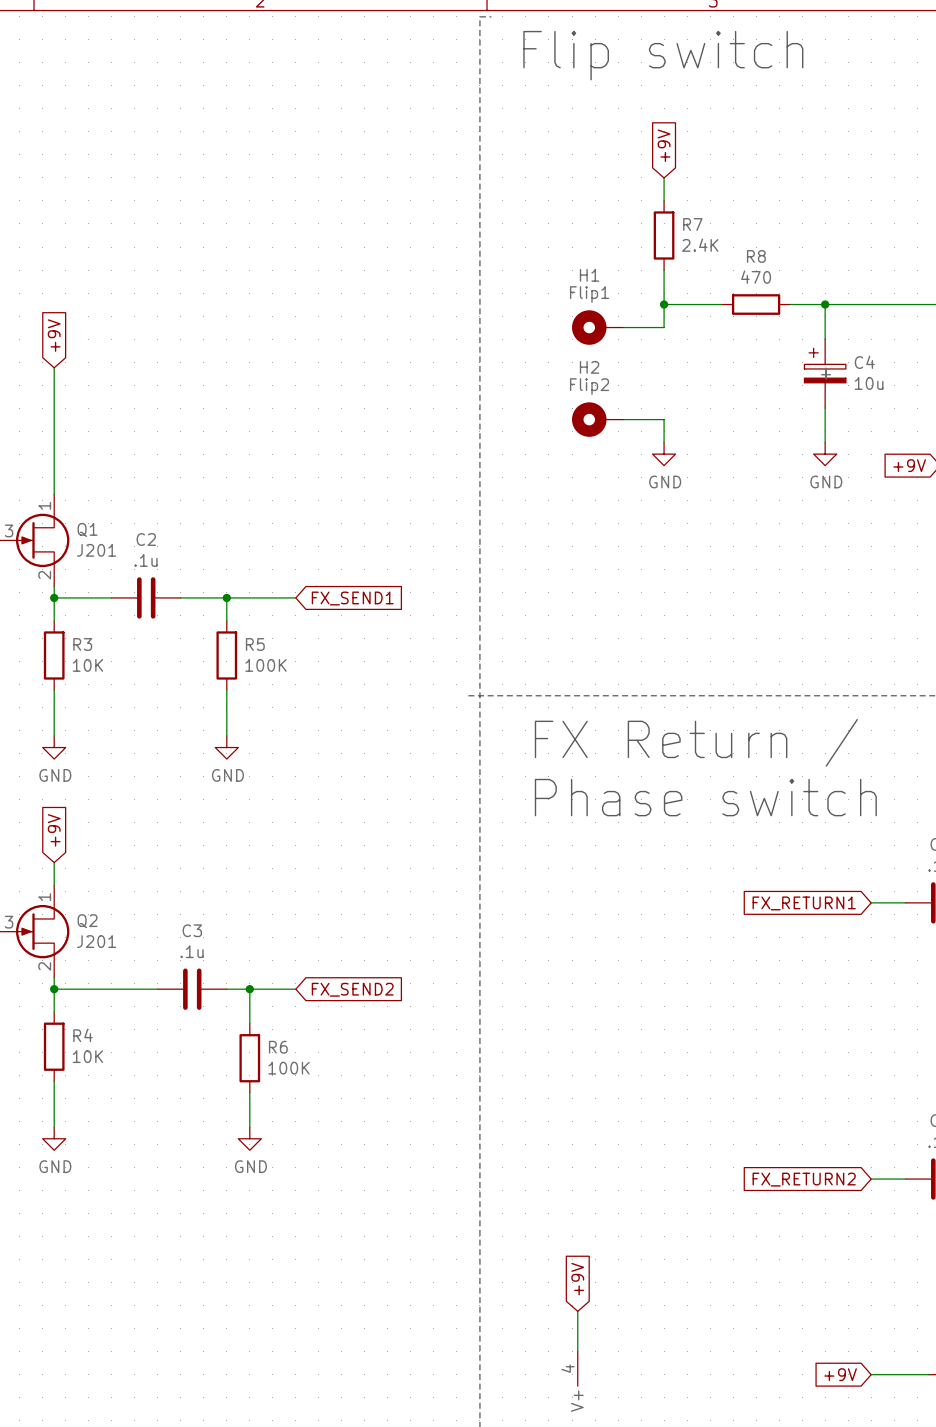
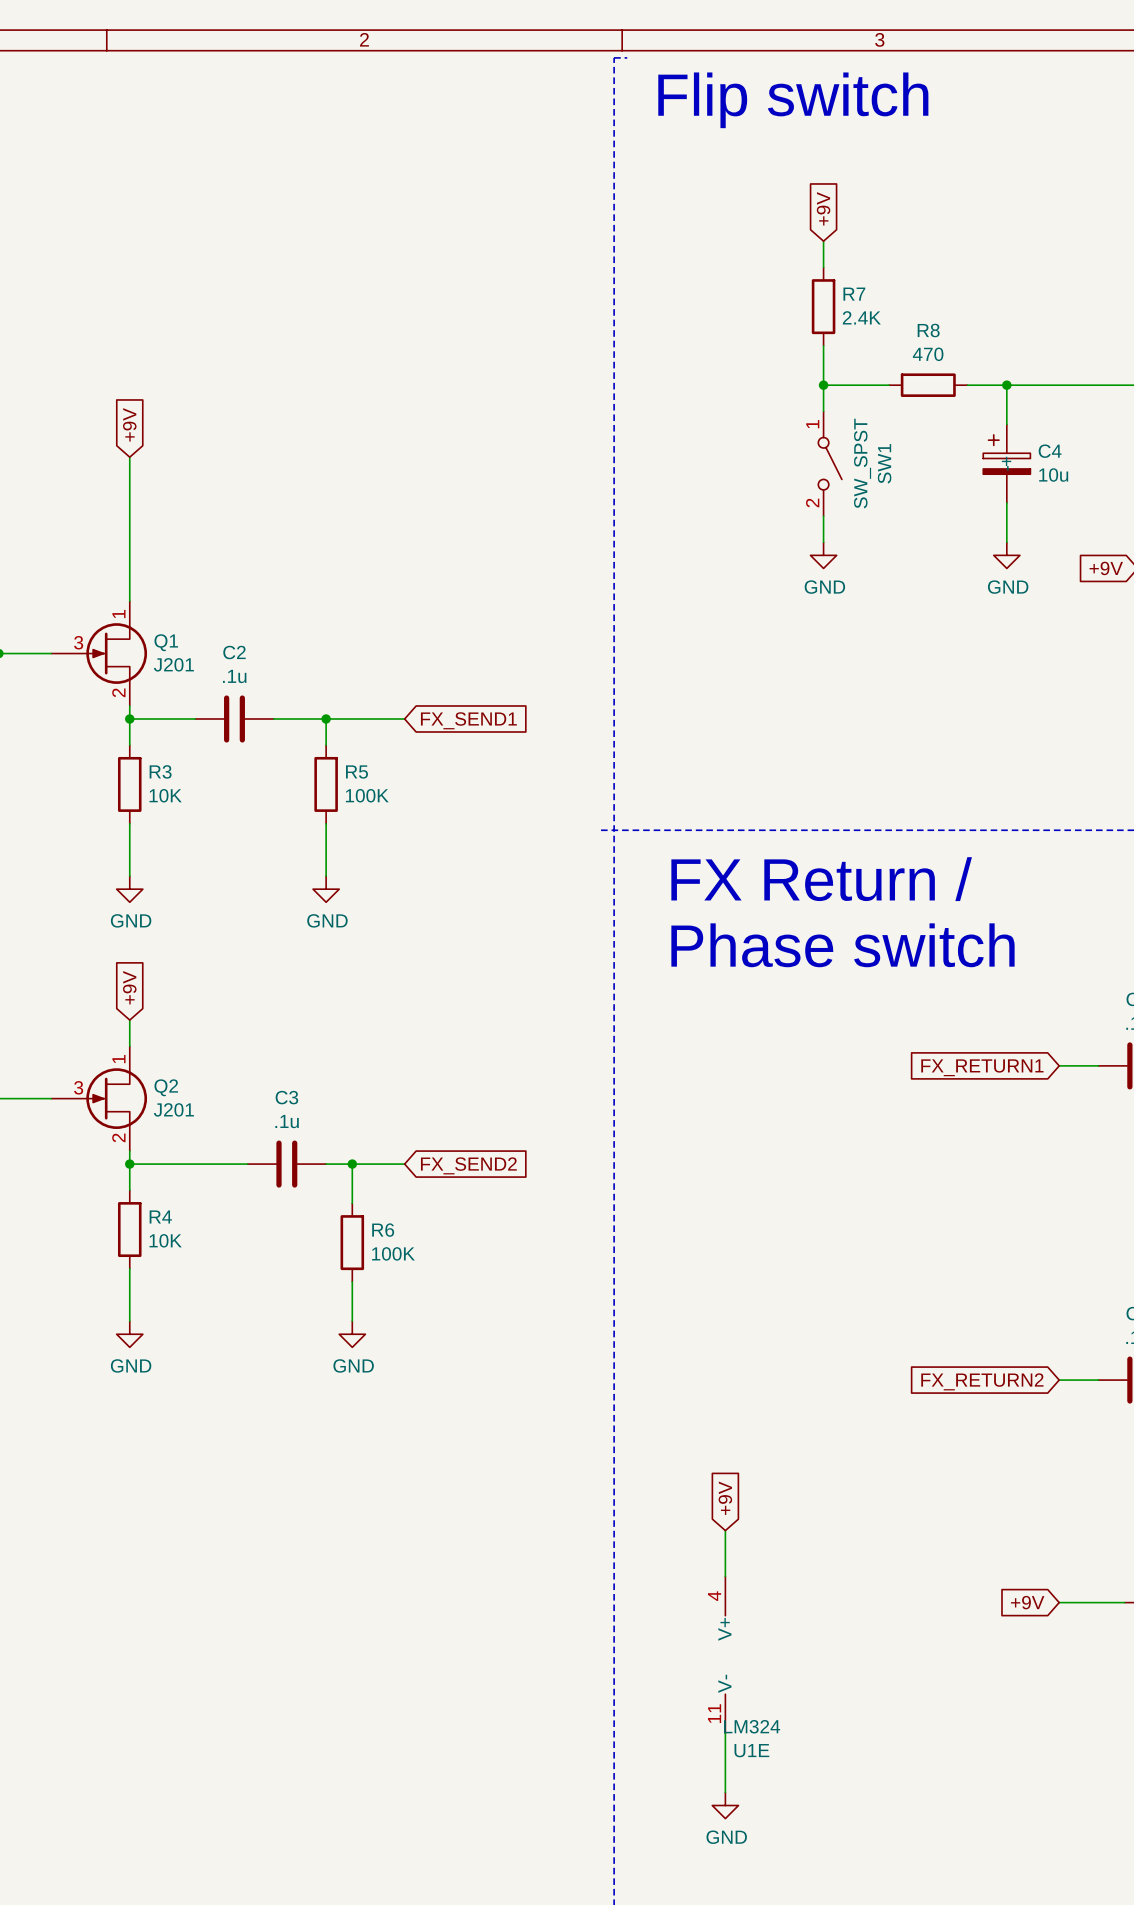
H1: Flip1 (597, 327) -> none
wire: (623, 327) (664, 327) -> none
SW1: none -> SW_SPST (830, 463)
H2: Flip2 (597, 419) -> none
wire: (623, 419) (664, 419) -> none

